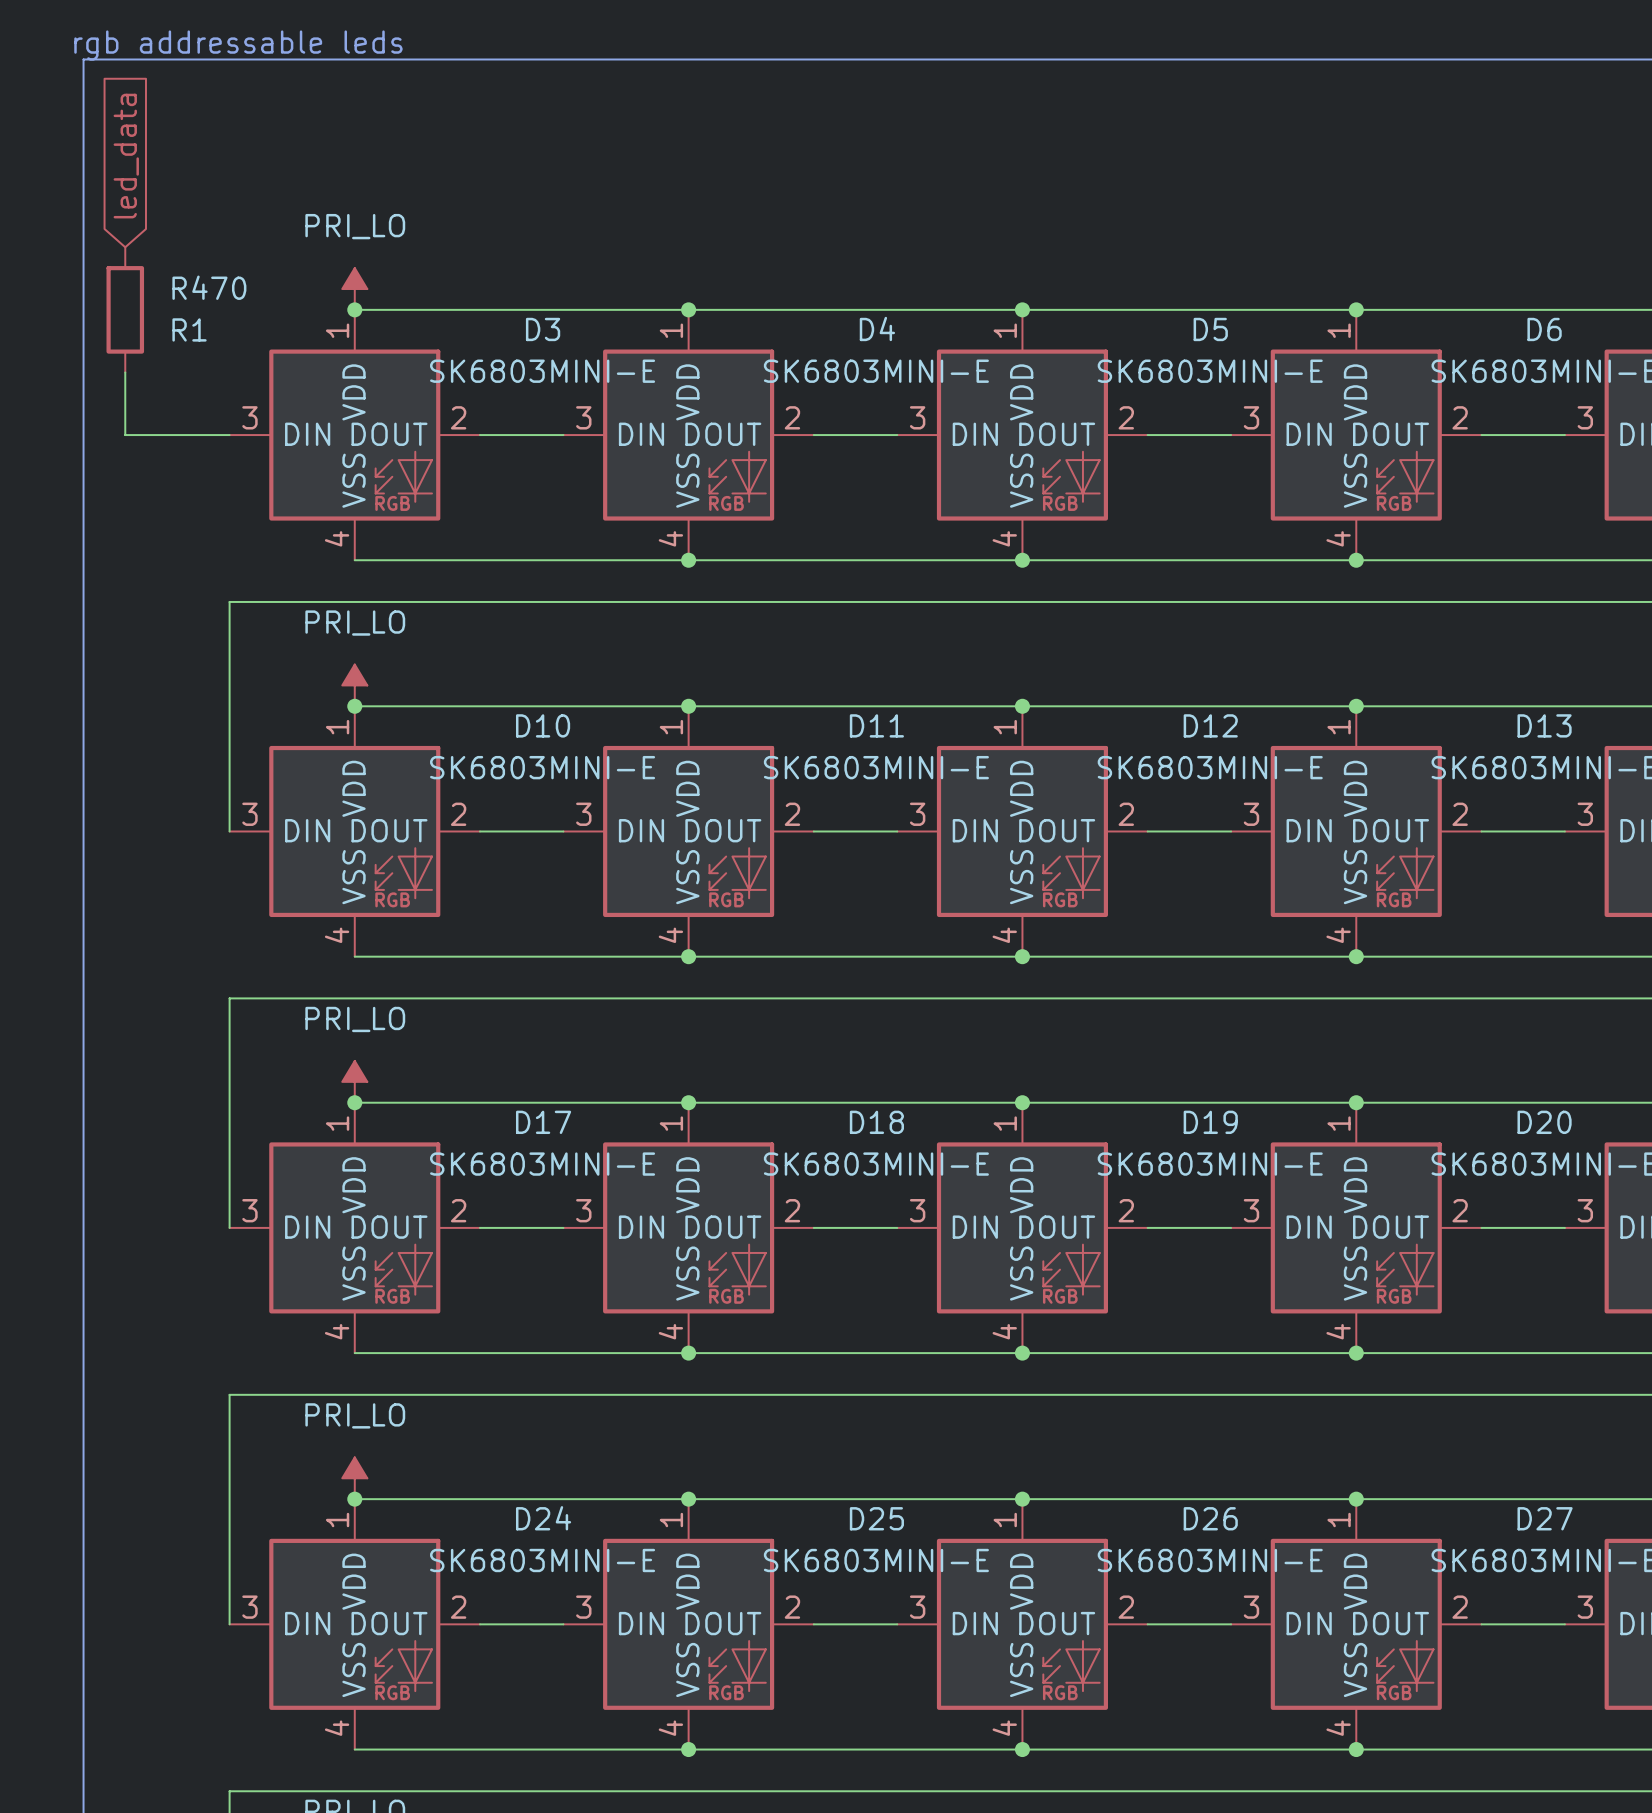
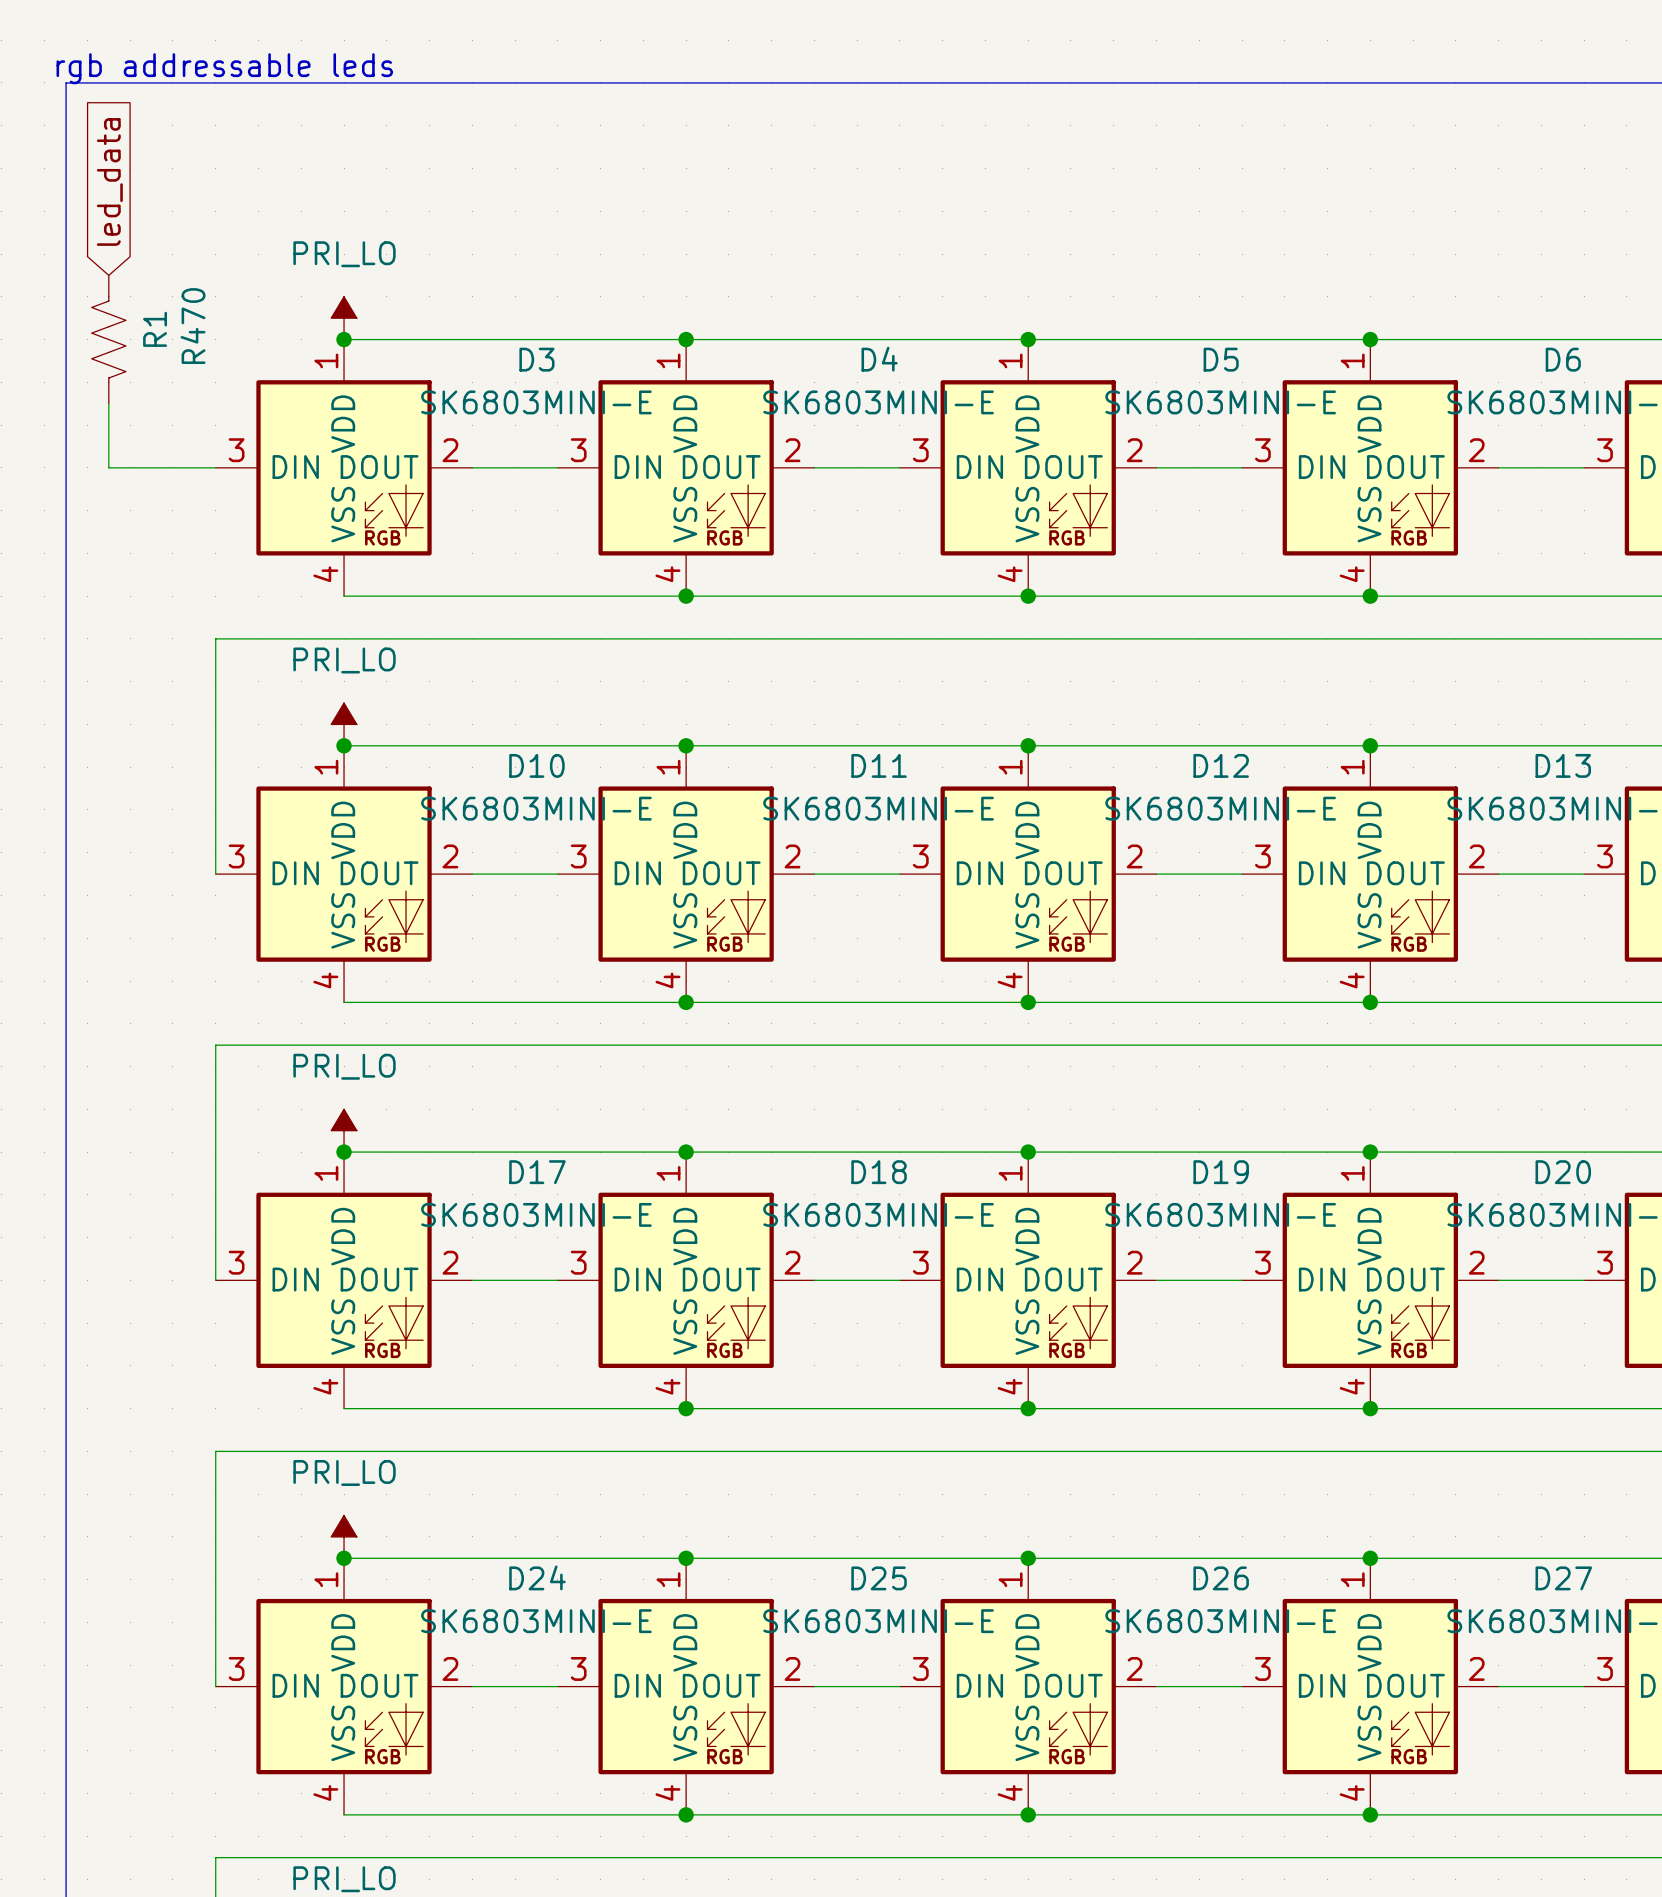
R1 symbol: [106, 247, 145, 373] -> [91, 275, 126, 404]
R1 name position: R1 (189, 329) -> R1 (155, 329)

